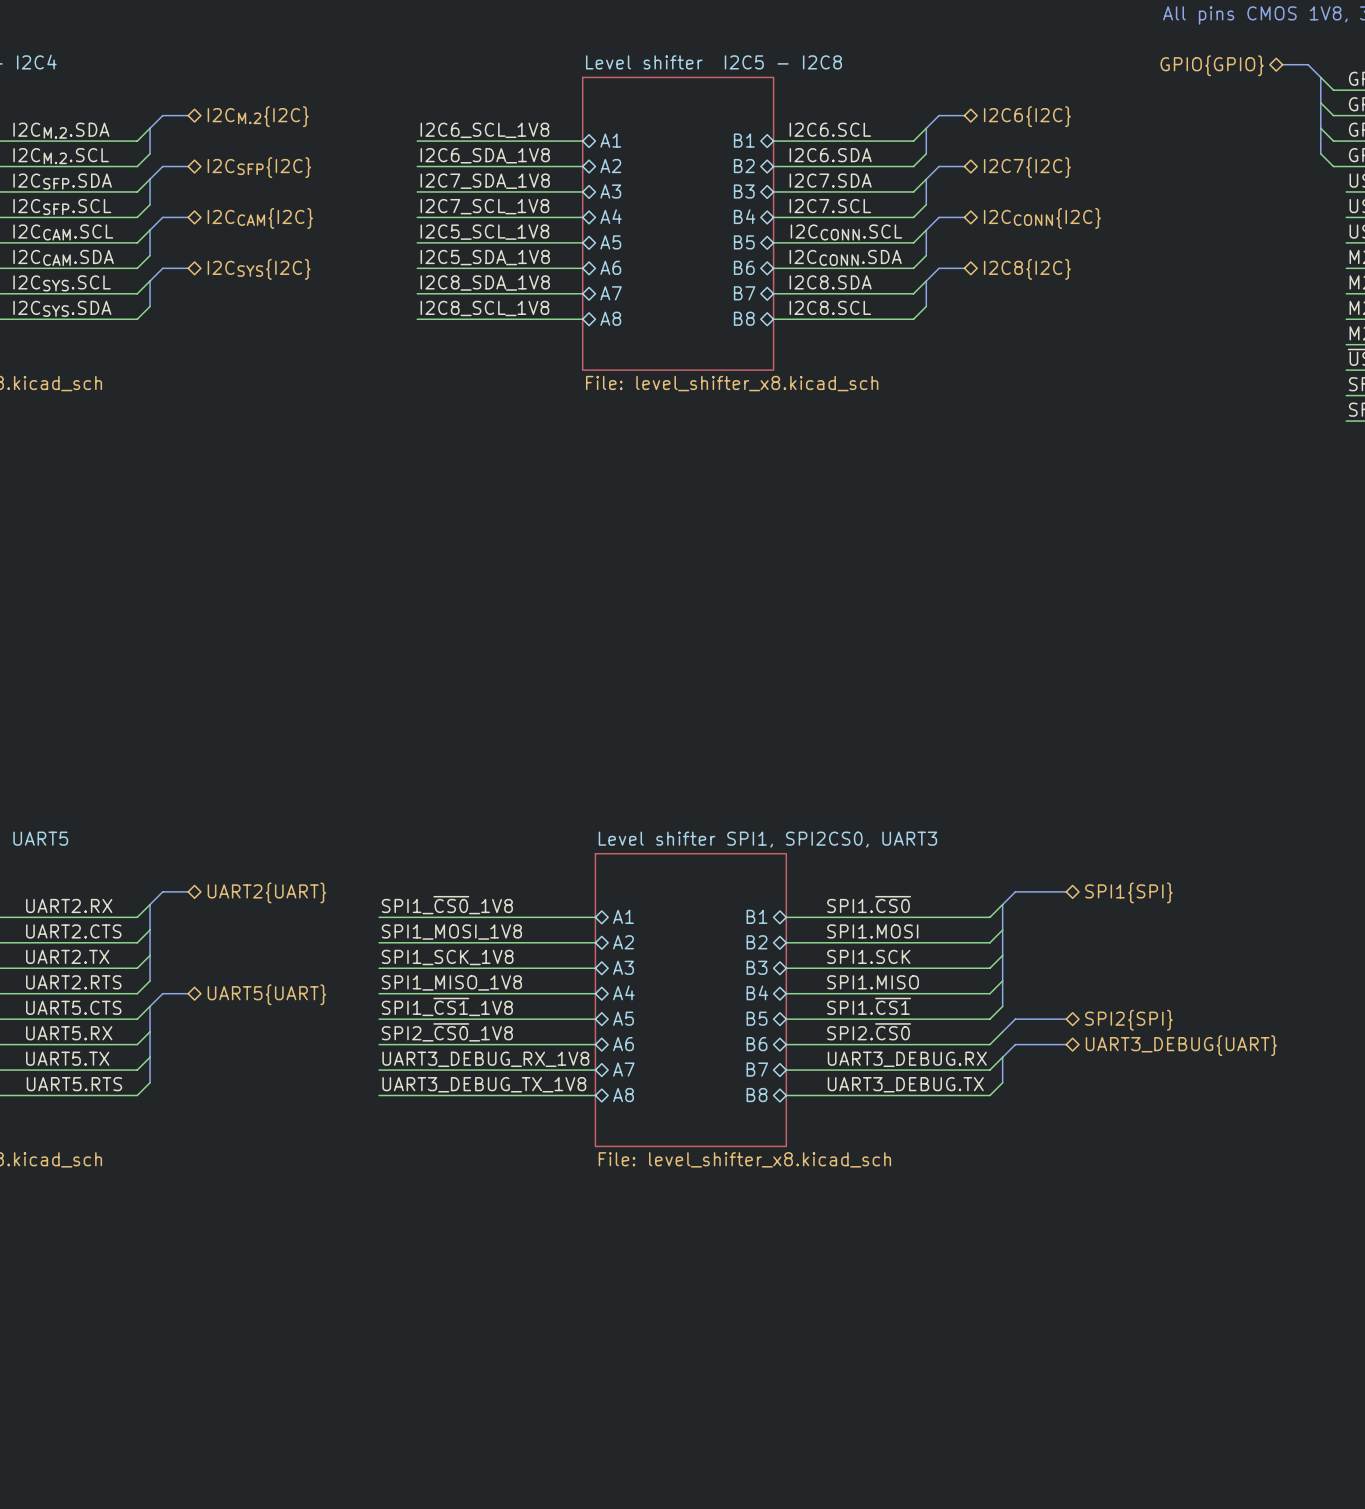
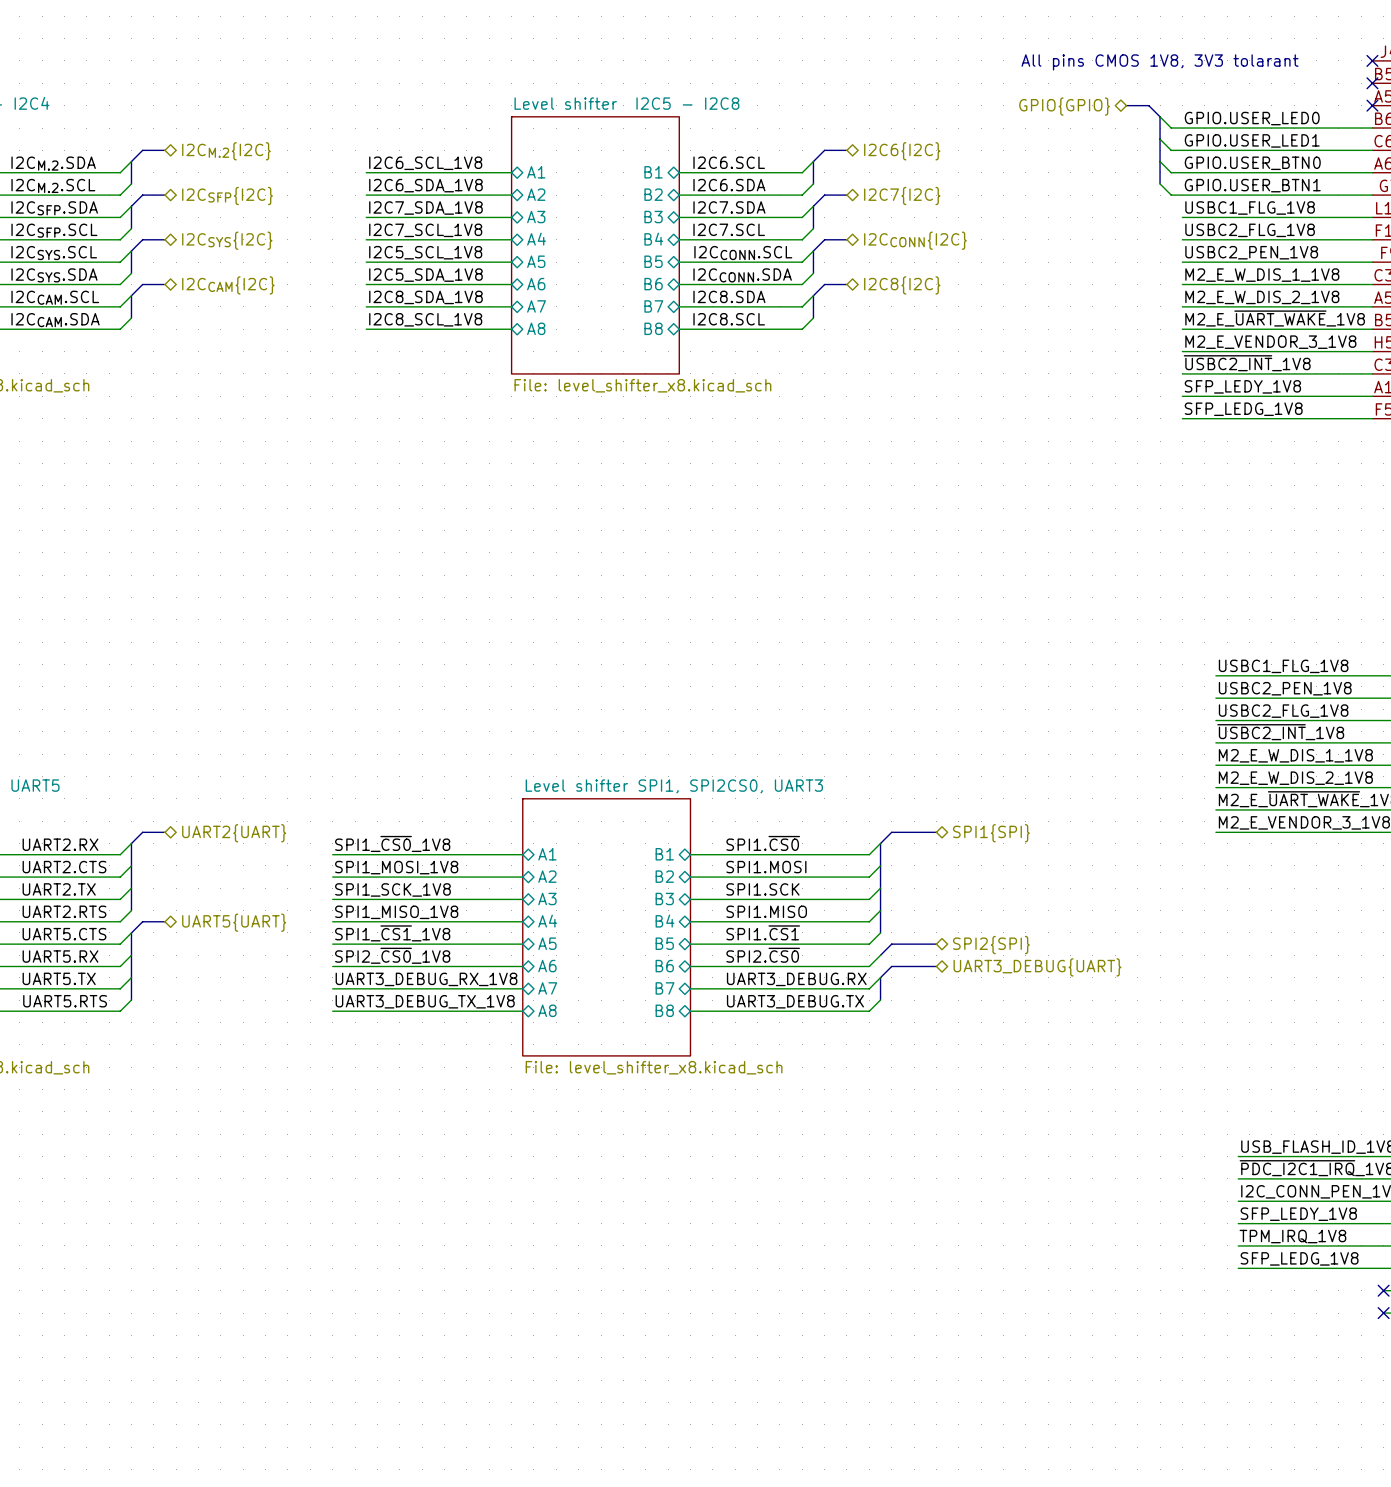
hierarchical label: I2CCAM{I2C} (260, 218) -> I2CSYS{I2C} (227, 240)
label: I2CCAM.SCL (63, 232) -> I2CSYS.SCL (54, 253)
label: I2CCAM.SDA (63, 257) -> I2CSYS.SDA (54, 275)
hierarchical label: I2CSYS{I2C} (259, 269) -> I2CCAM{I2C} (228, 285)
label: I2CSYS.SCL (62, 283) -> I2CCAM.SCL (55, 297)
label: I2CSYS.SDA (62, 308) -> I2CCAM.SDA (55, 320)

